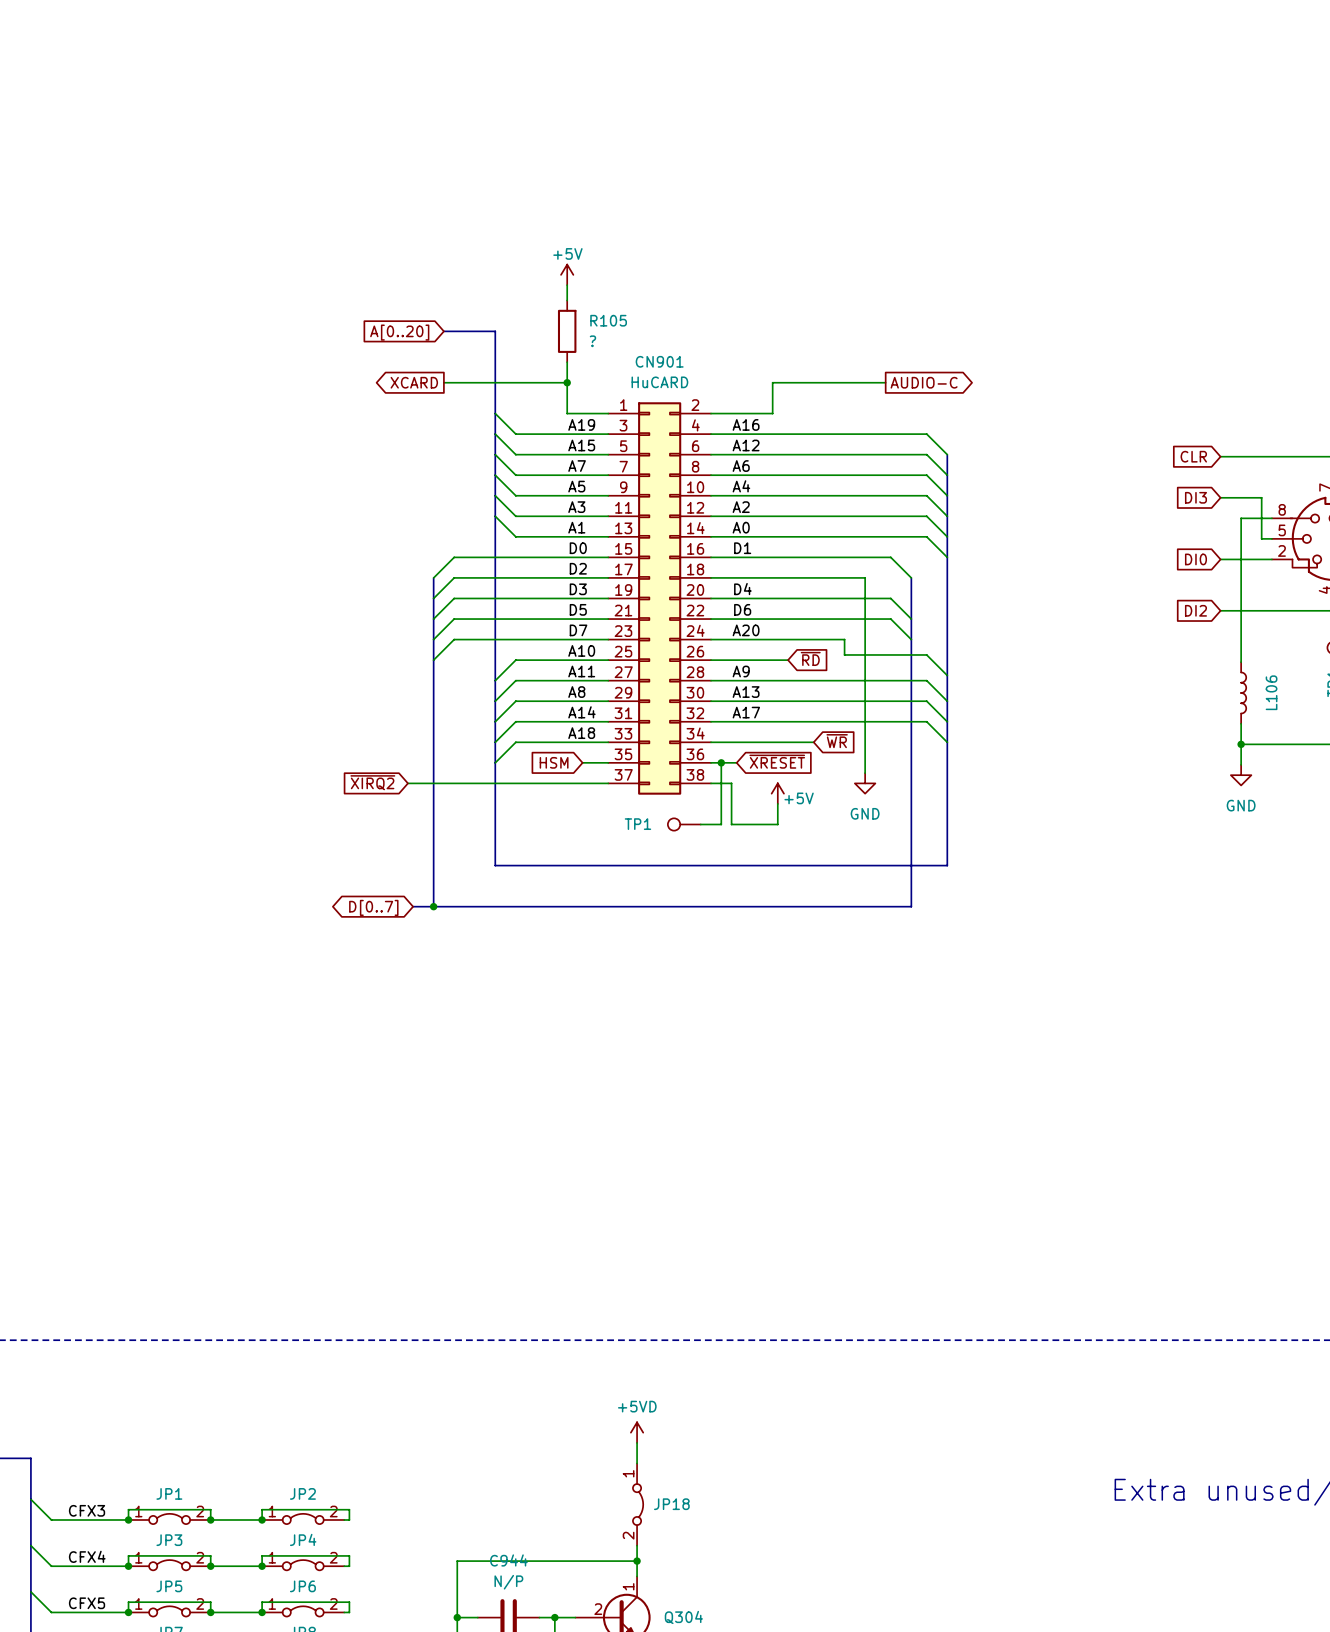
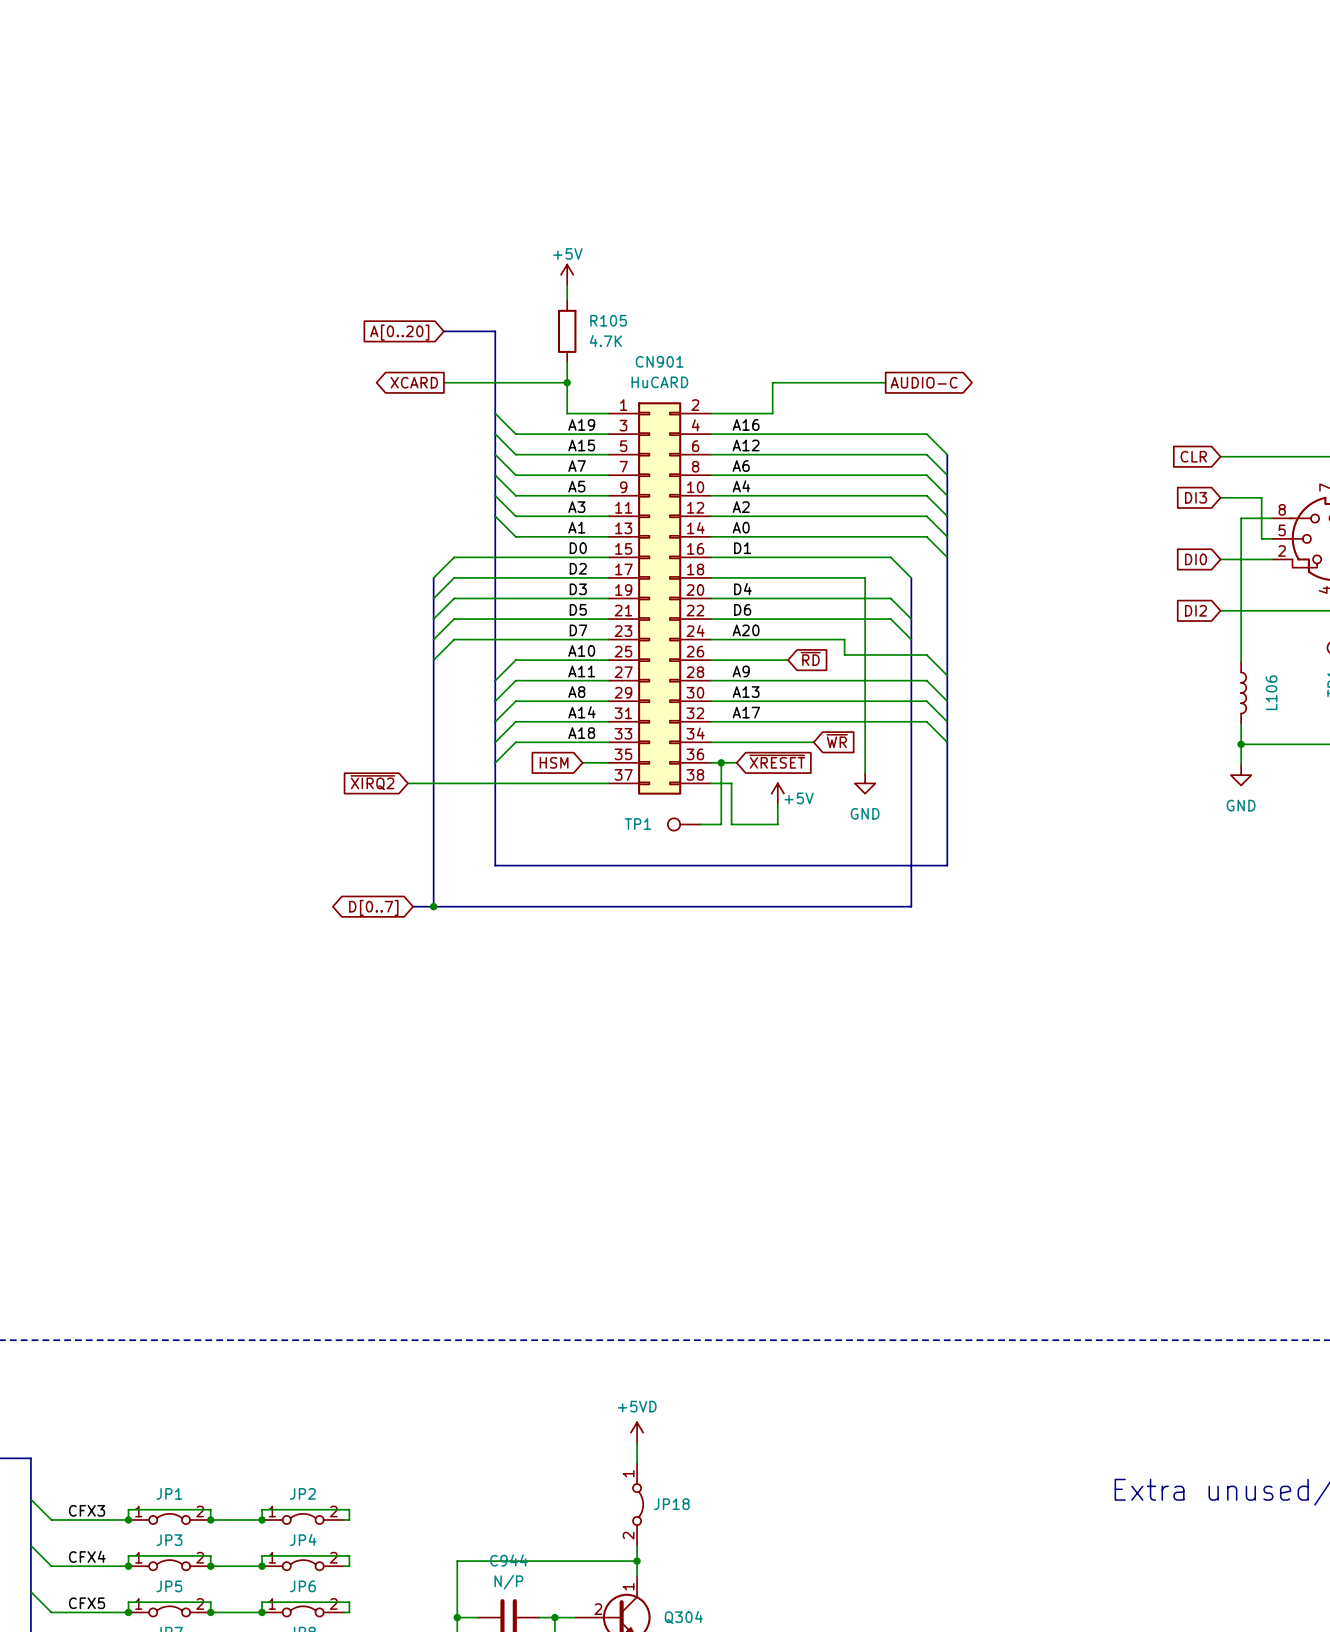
R105 value: ? (592, 341) -> 4.7K (605, 341)

